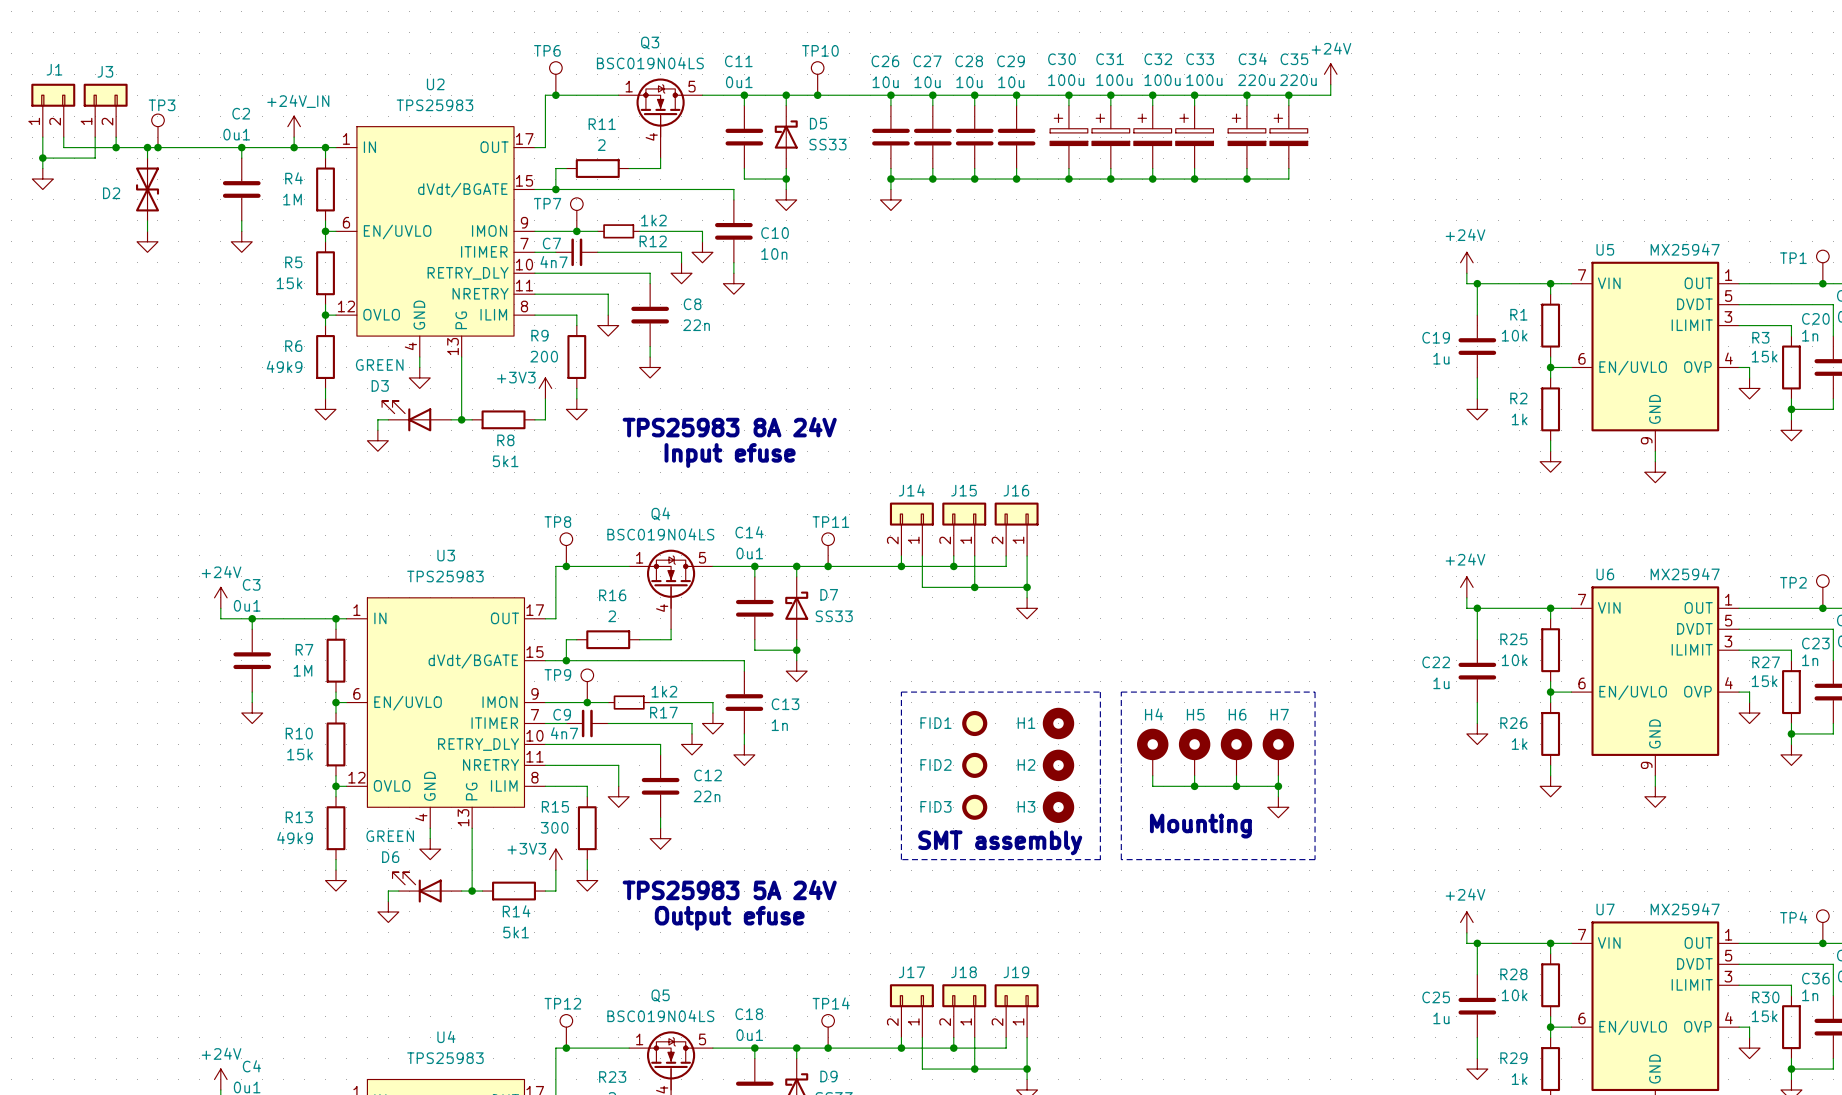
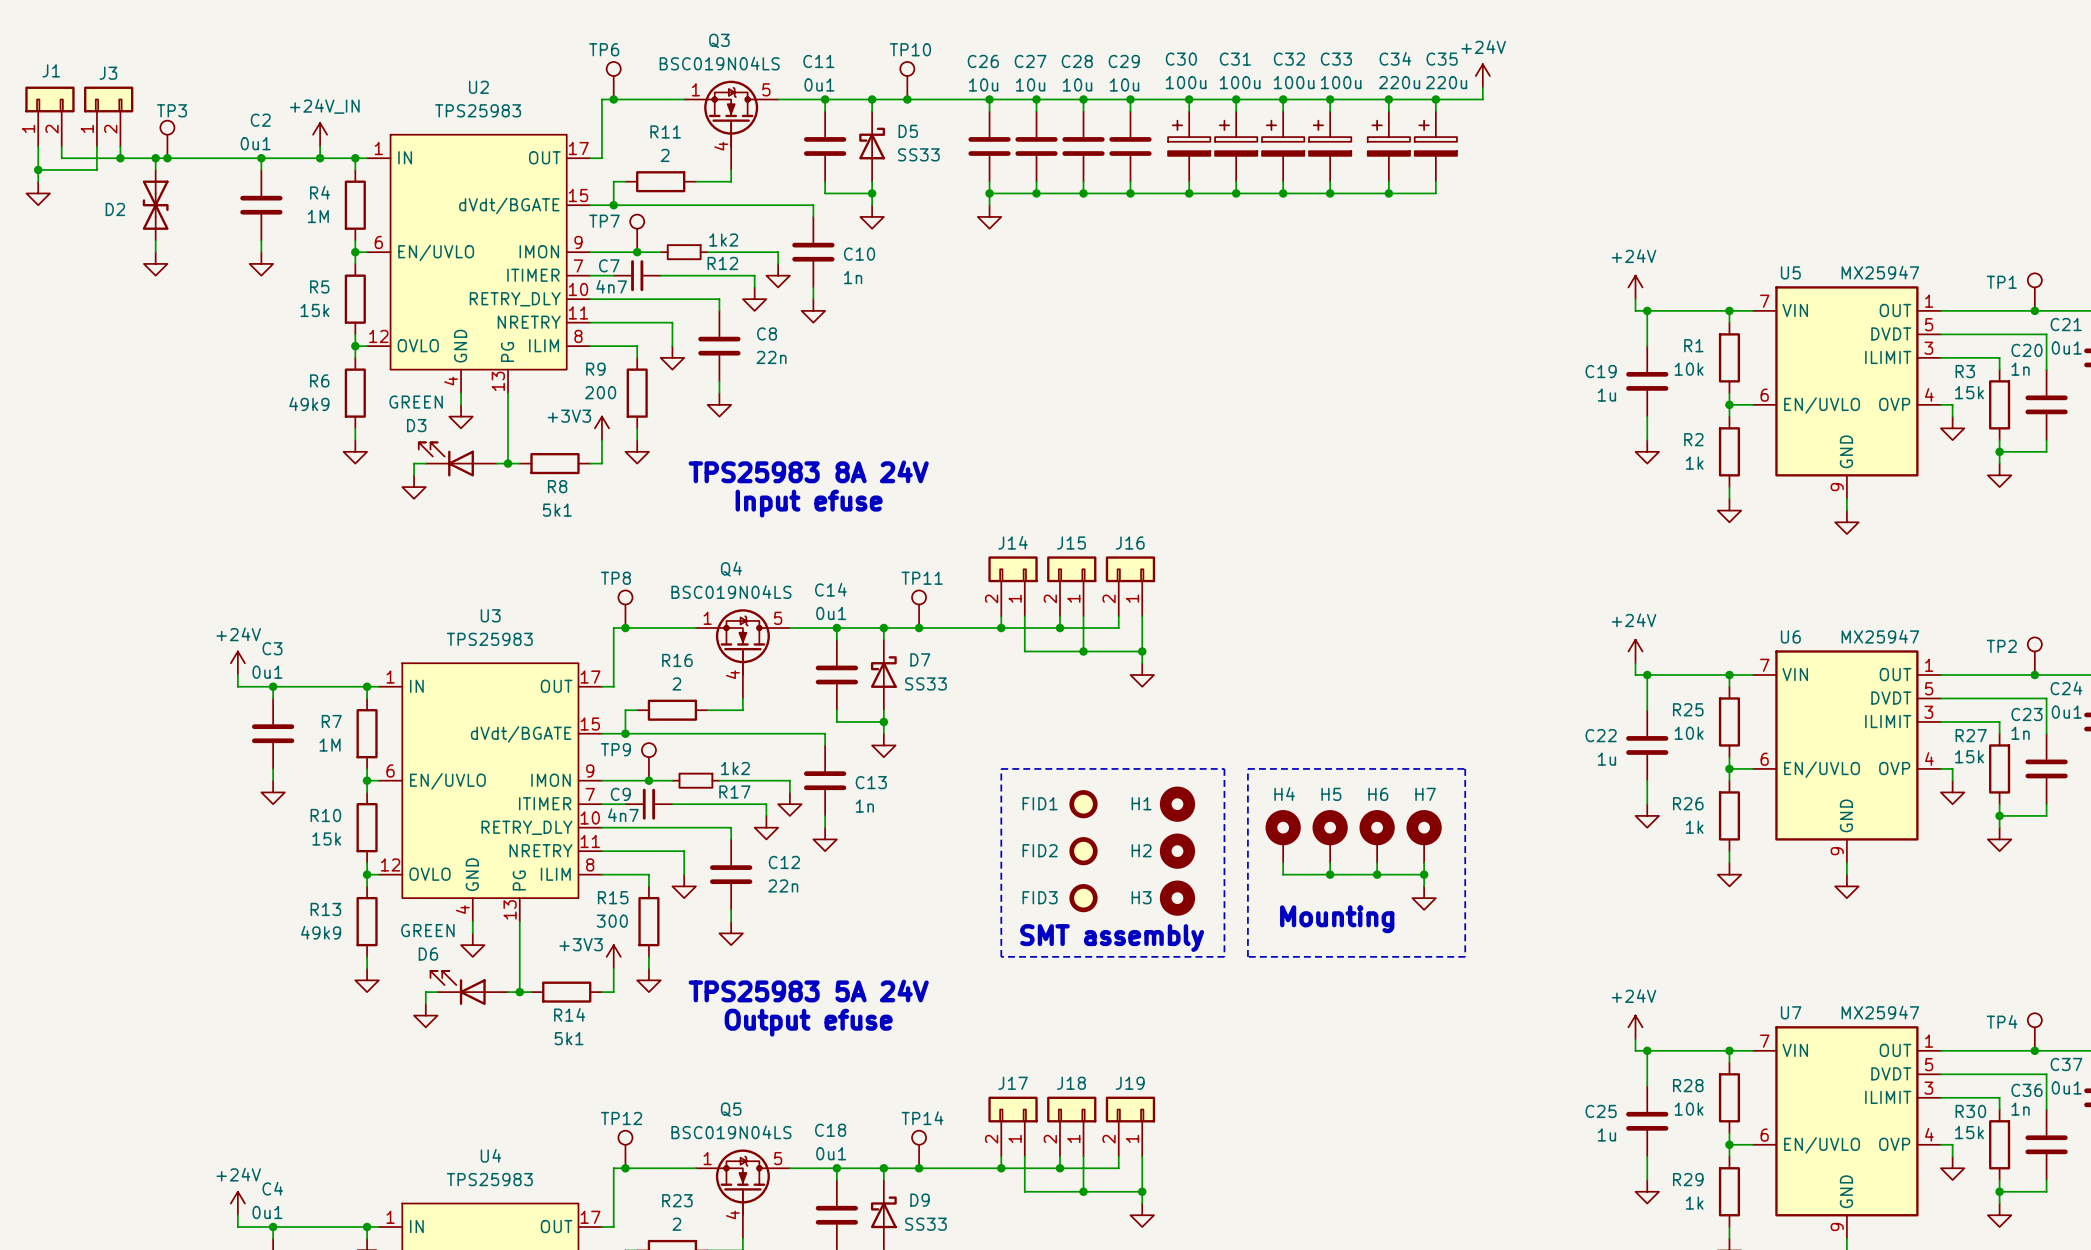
C10 value: 10n (774, 254) -> 1n (853, 277)

